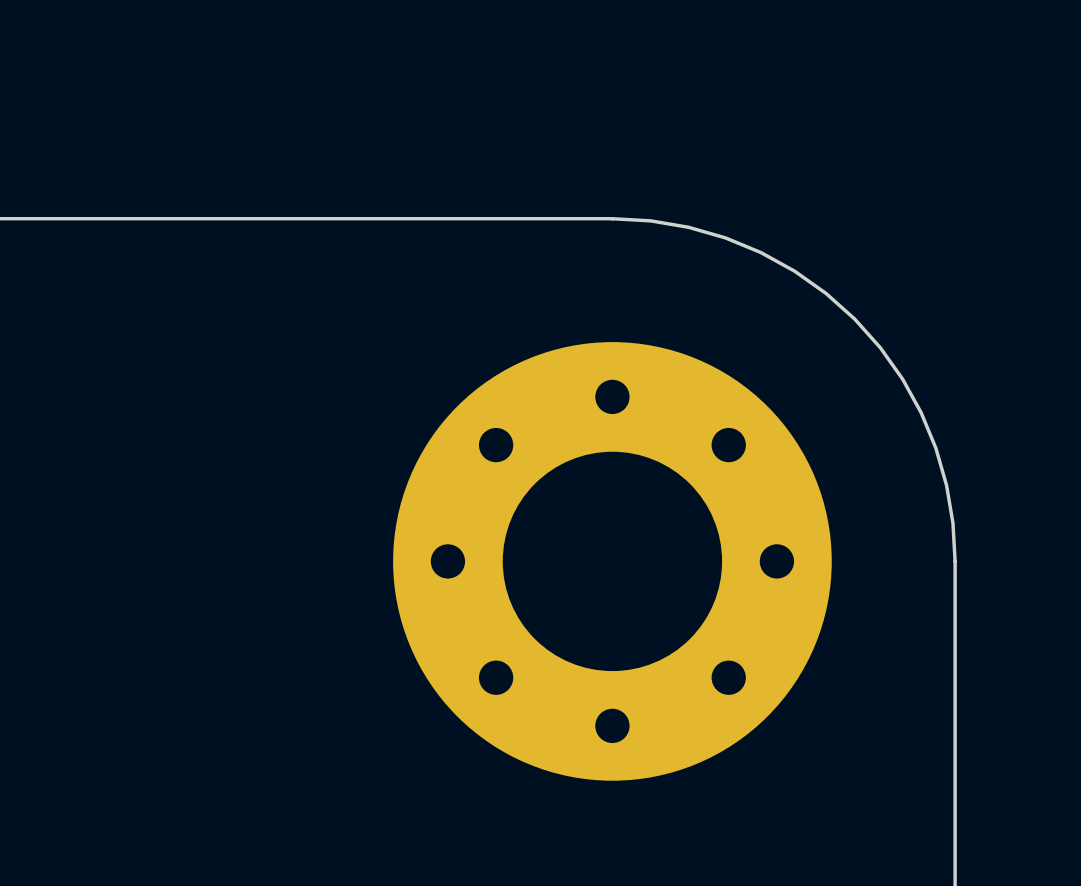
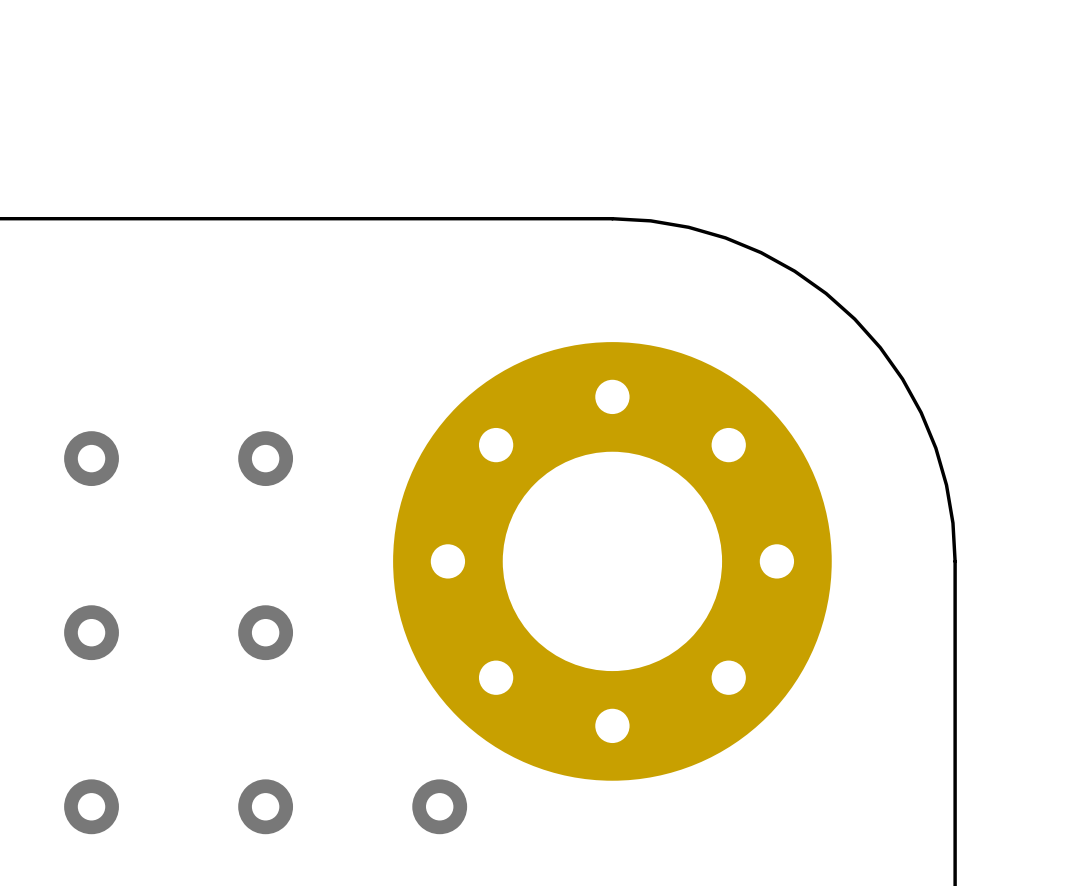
via: none -> (91, 458)
via: none -> (265, 458)
via: none -> (91, 632)
via: none -> (265, 632)
via: none -> (91, 806)
via: none -> (265, 806)
via: none -> (439, 806)

